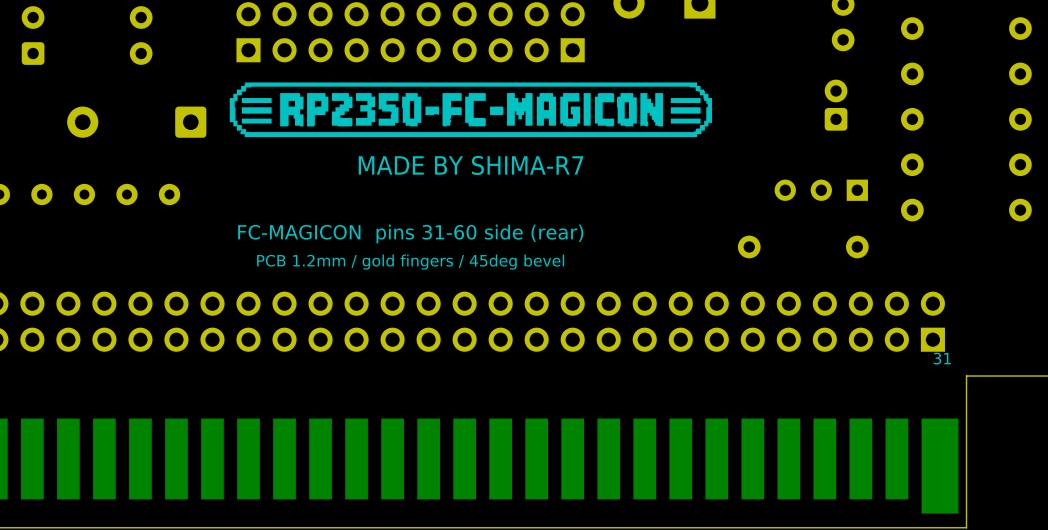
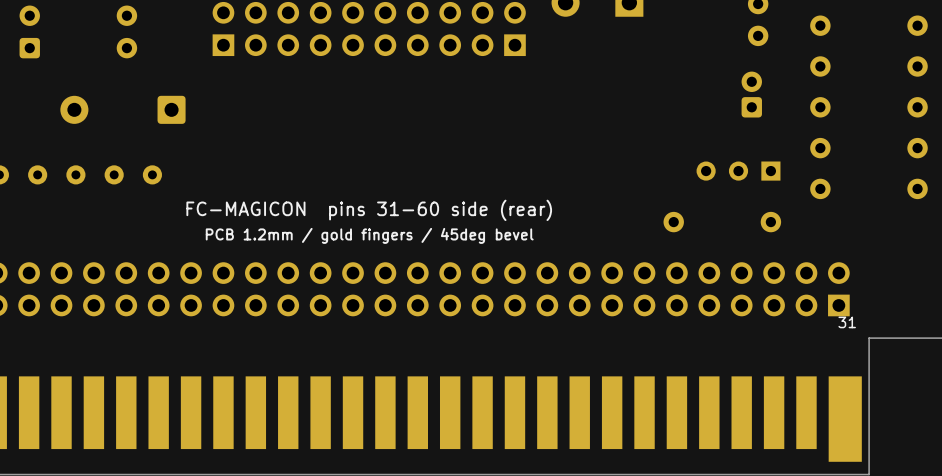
drawing: [229, 82, 712, 138] -> none
text: MADE BY SHIMA-R7 (471, 165) -> none

